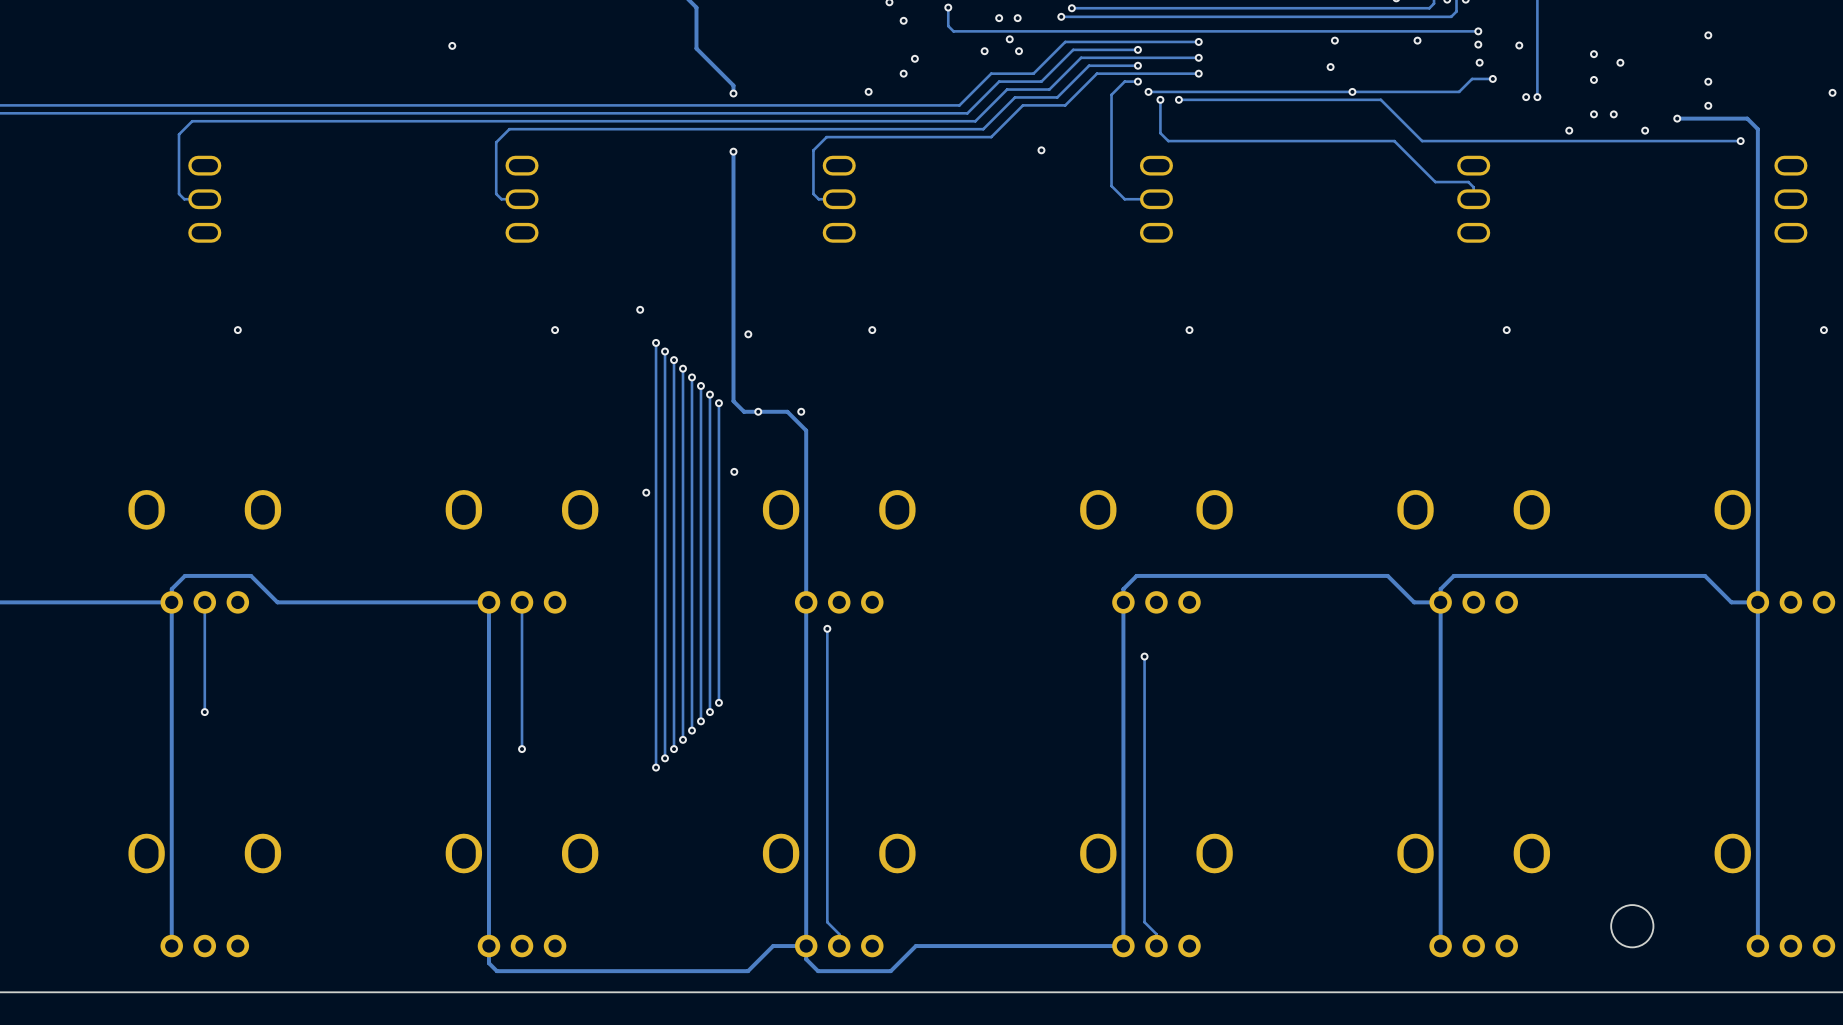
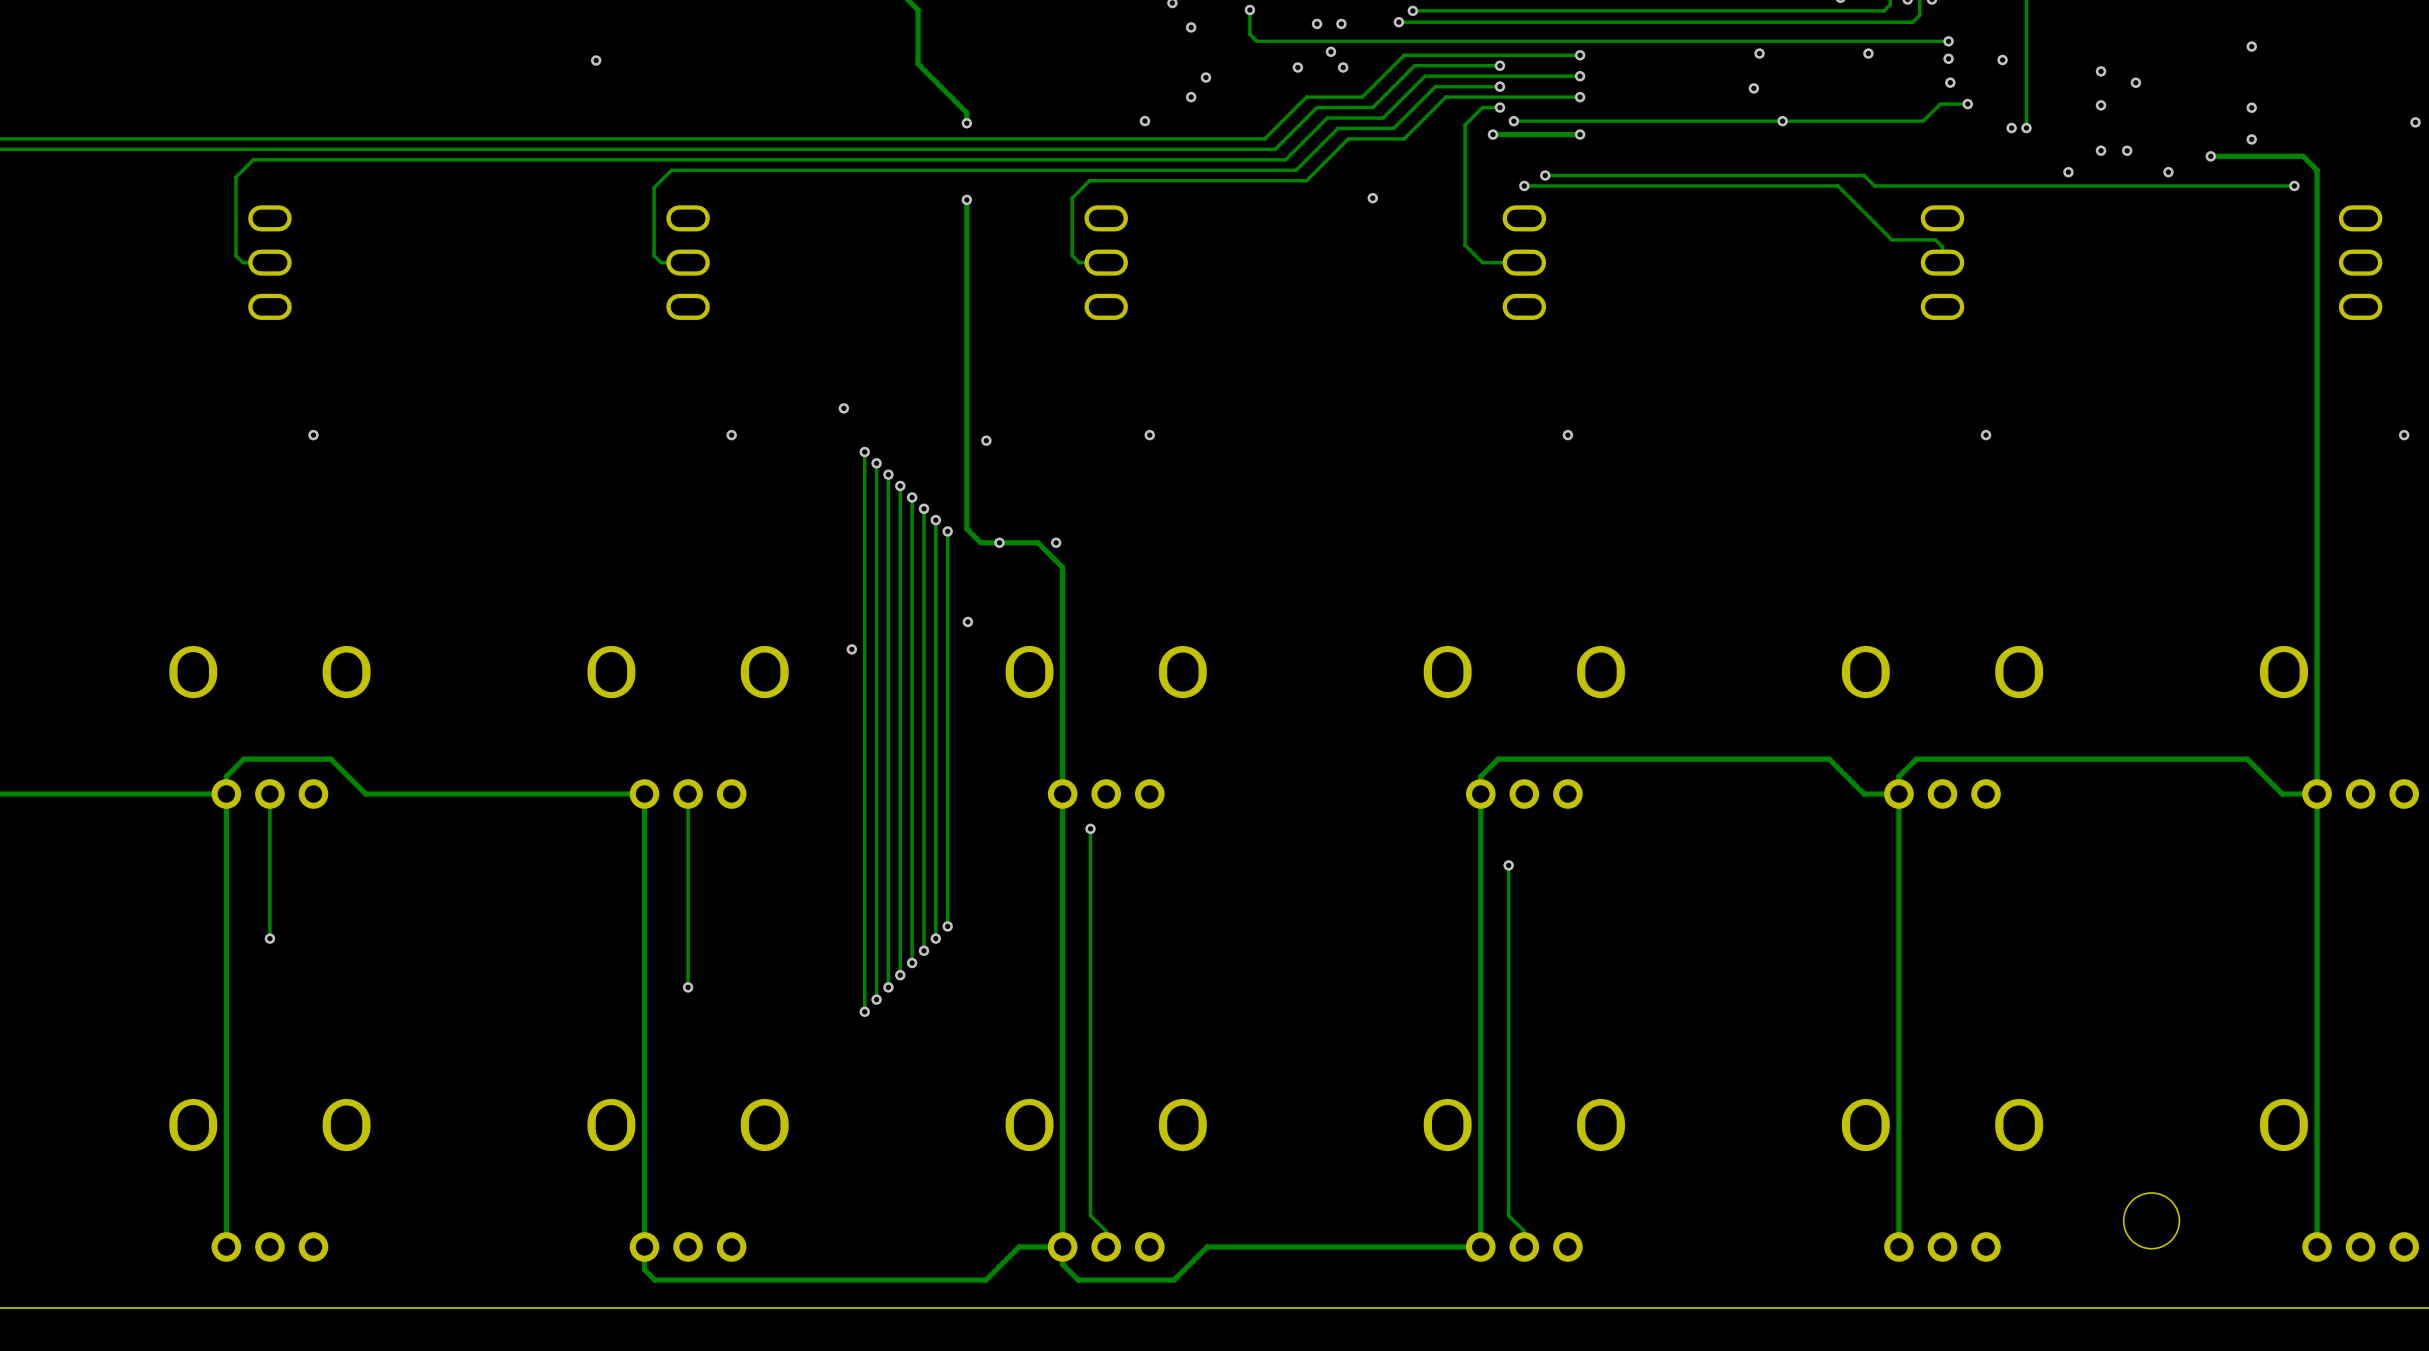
track: (1160, 99) (1160, 133) (1168, 141) -> (1524, 185) (1540, 185)
via: (1160, 99) -> none
track: (1178, 99) (1380, 99) (1414, 133) -> (1545, 175) (1864, 175)
via: (1178, 99) -> none
via: none -> (1492, 134)
track: none -> (1580, 134) (1492, 134)
via: none -> (1580, 134)
via: none -> (1545, 175)
via: none -> (1524, 185)

